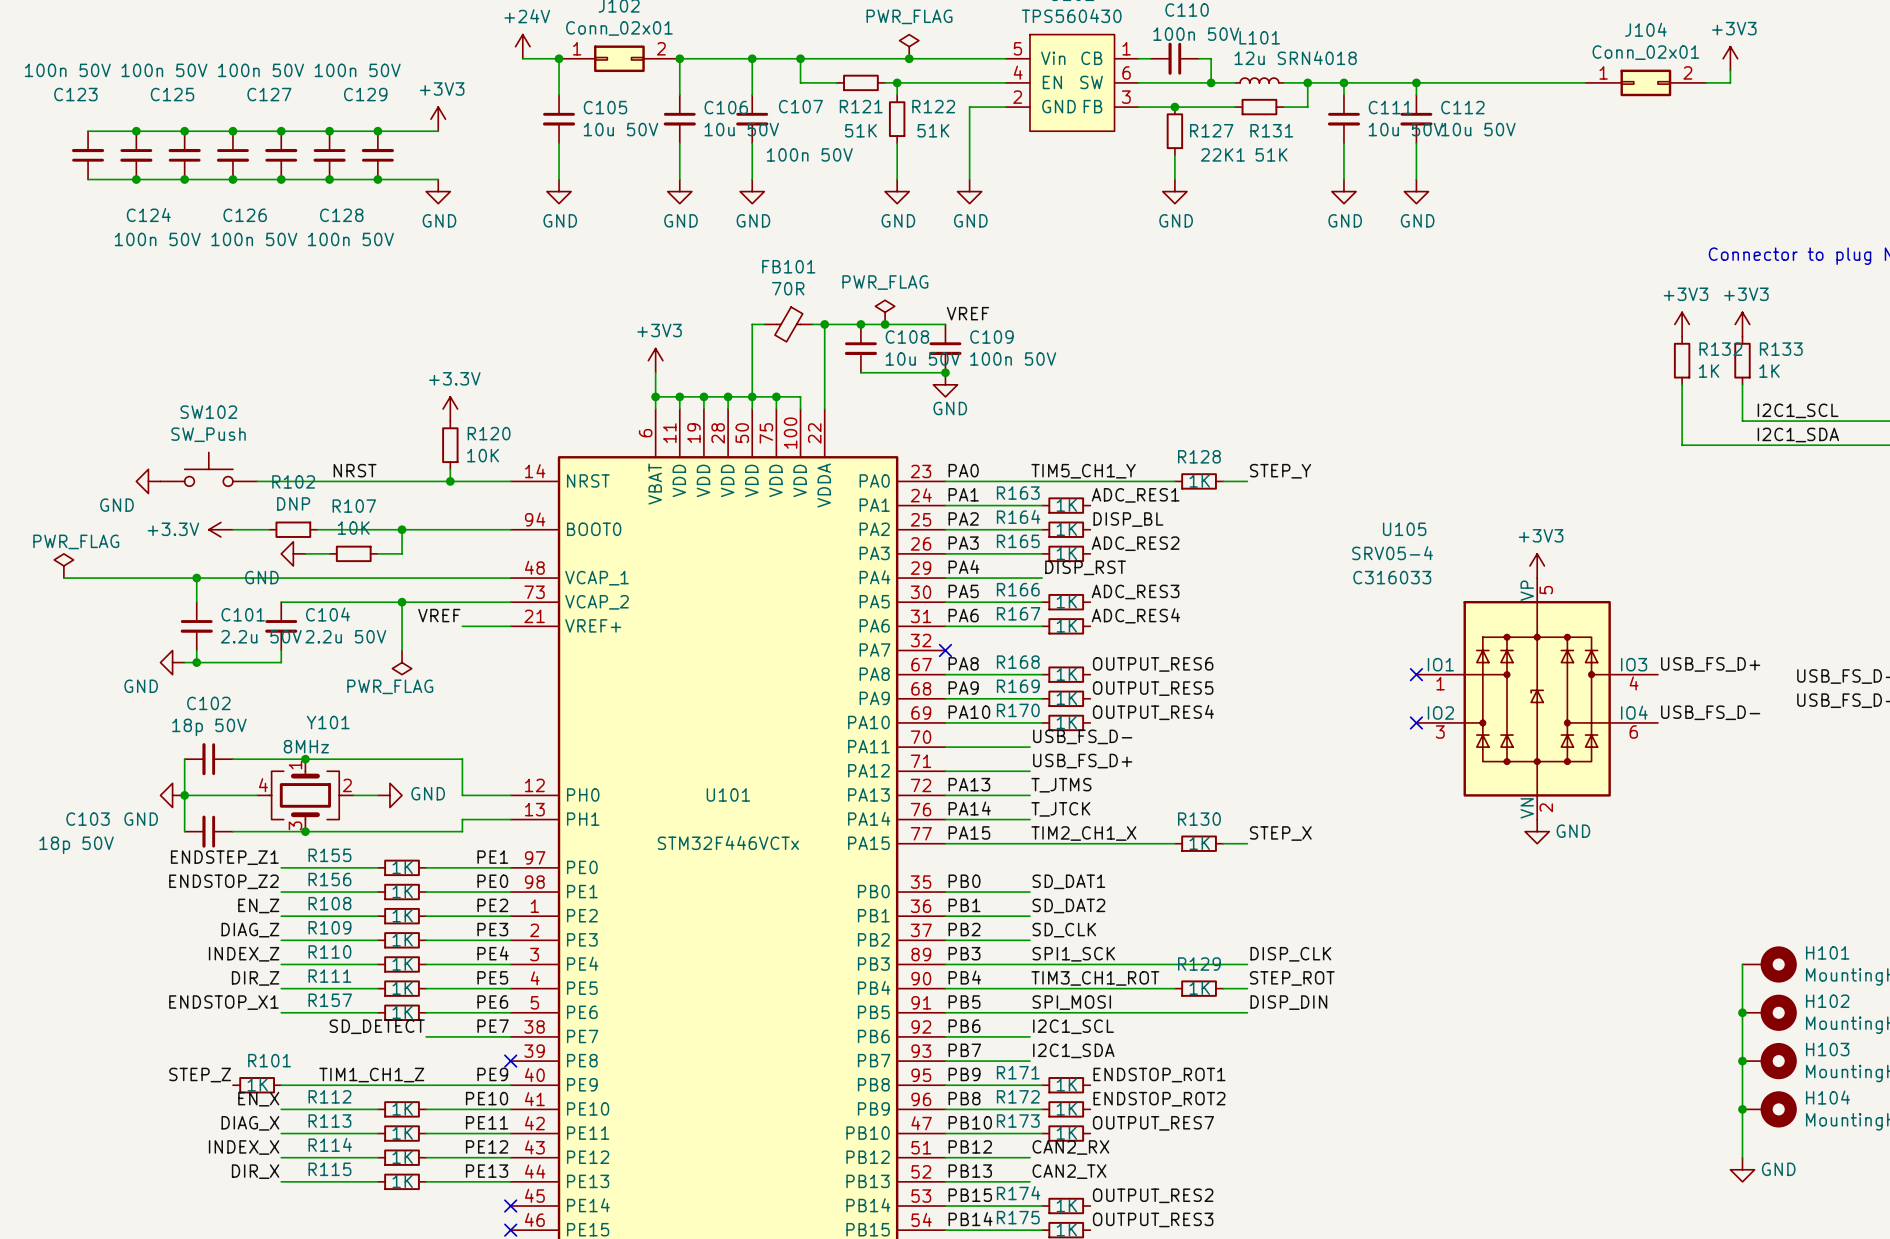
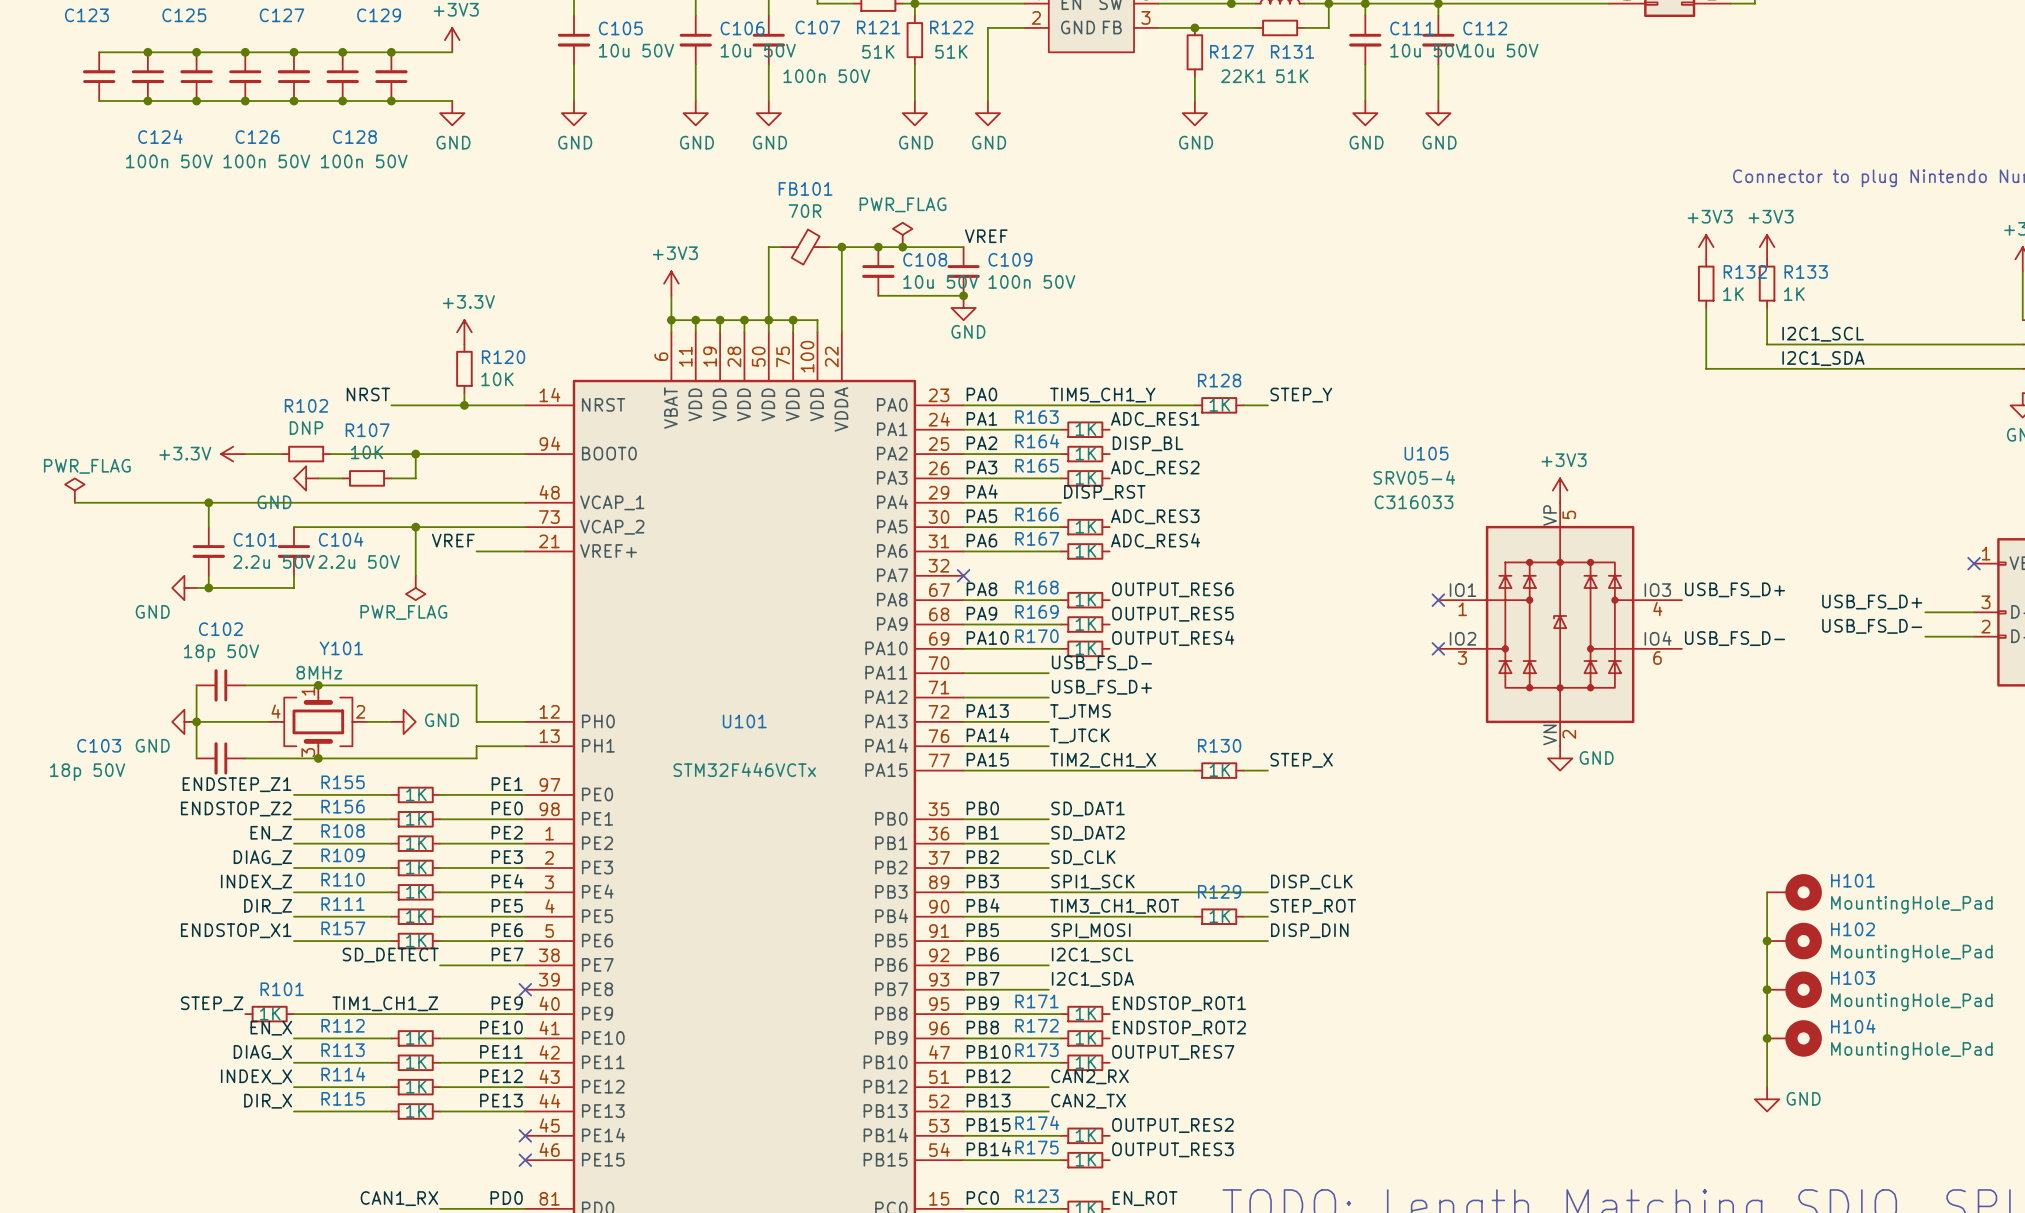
SW102: SW_Push (208, 469) -> none
power symbol: GND (148, 481) -> none
wire: (257, 481) (377, 481) -> none

